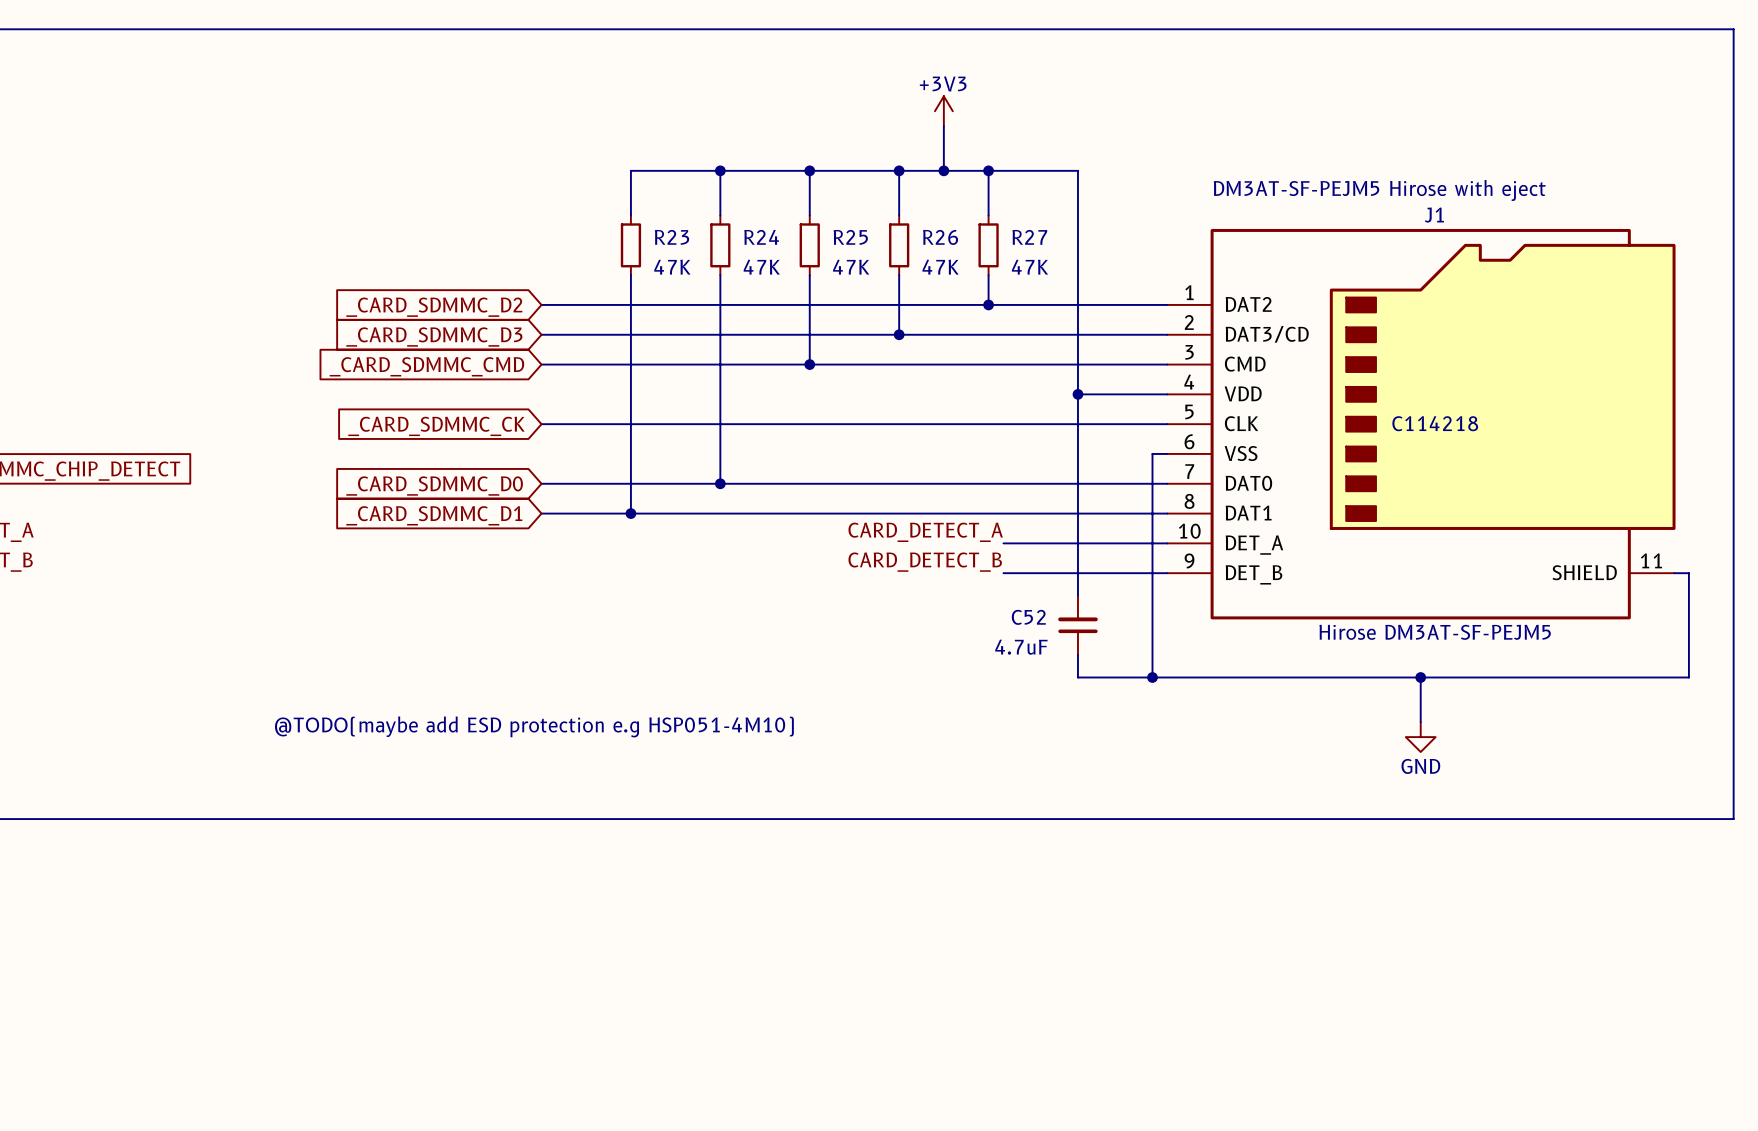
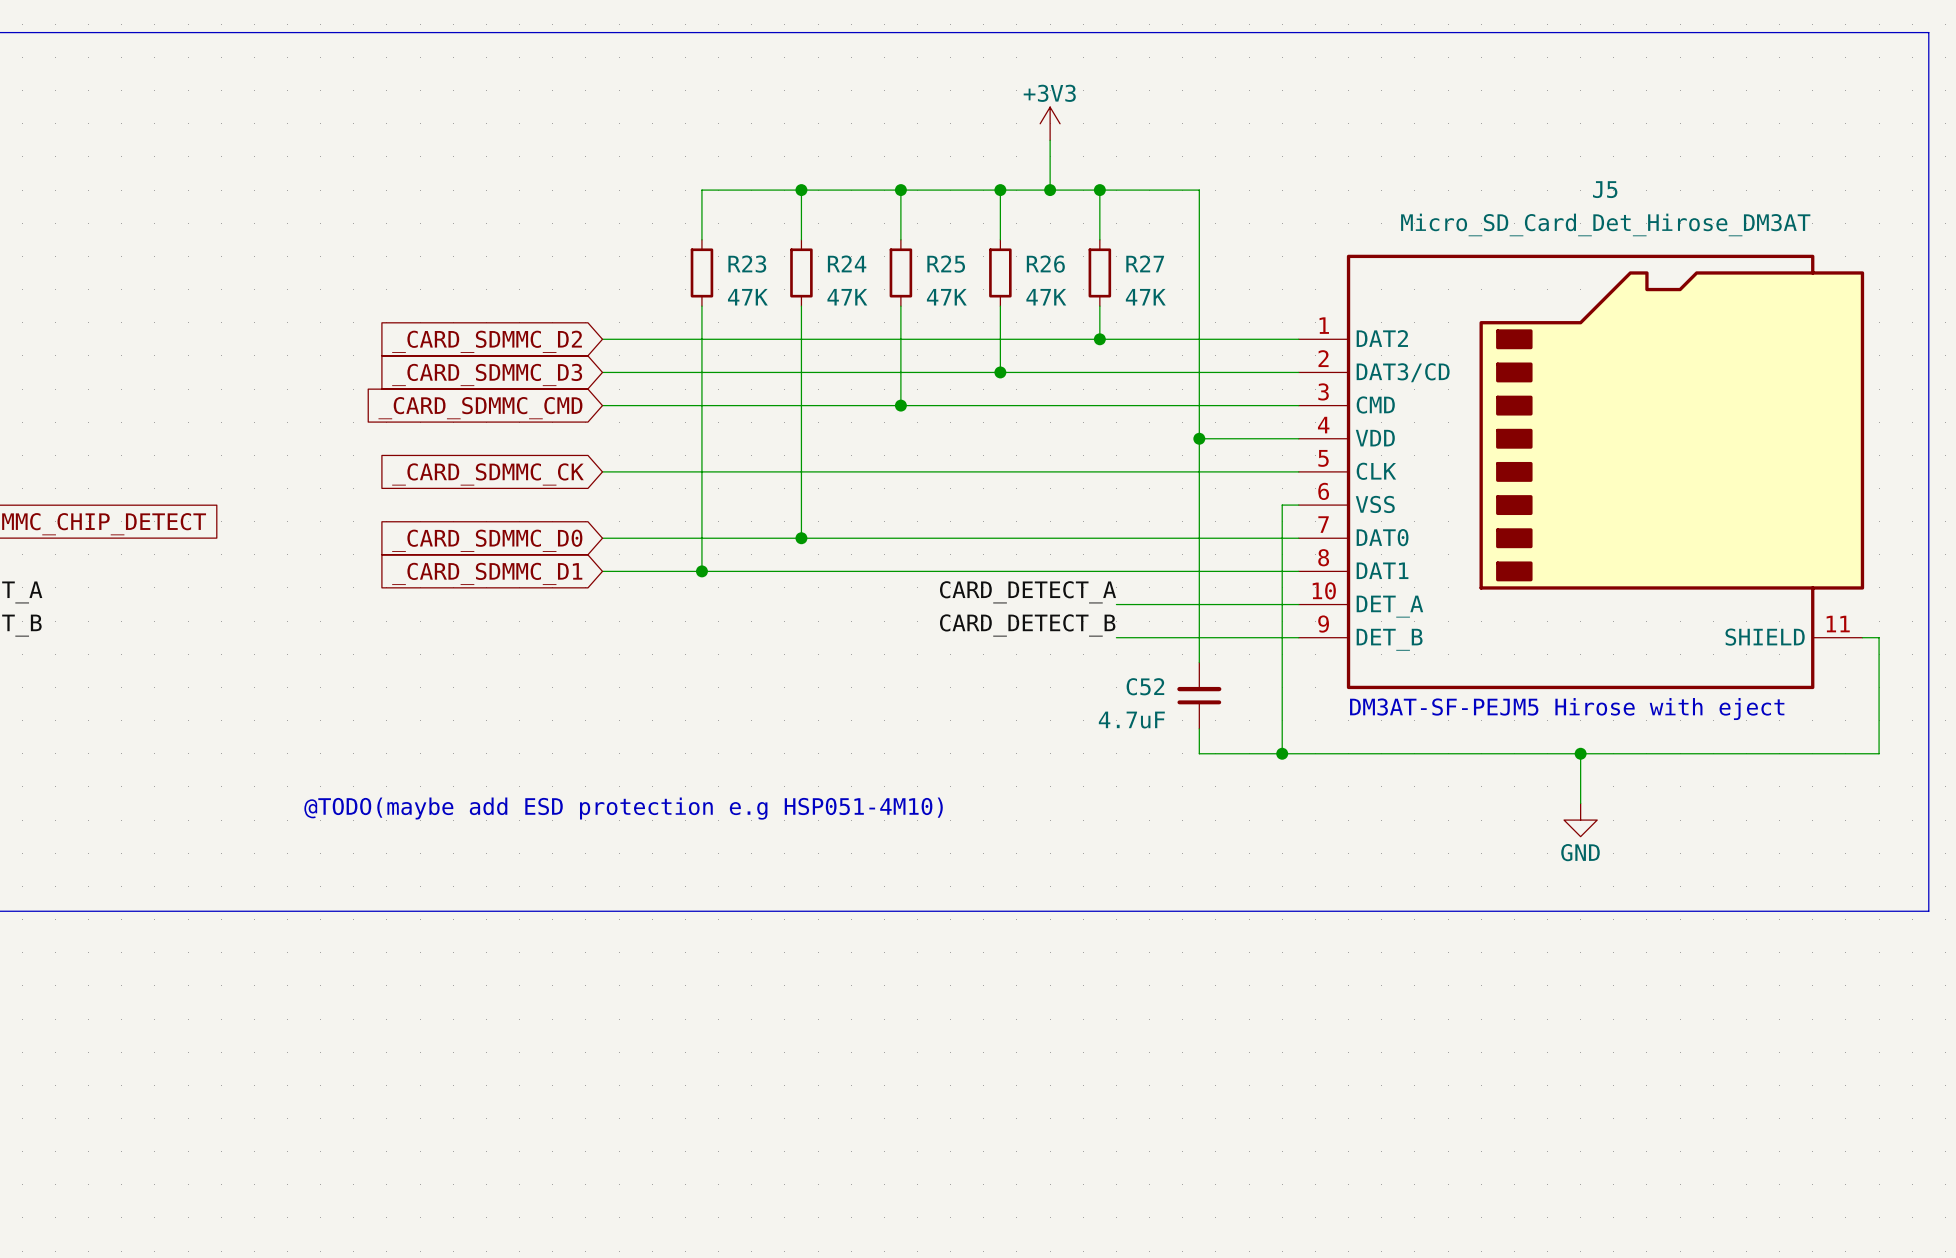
text: DM3AT-SF-PEJM5 Hirose with eject (1379, 190) -> none
J1: Hirose DM3AT-SF-PEJM5 (1421, 424) -> none
J5: none -> Micro_SD_Card_Det_Hirose_DM3AT (1581, 471)
text: none -> DM3AT-SF-PEJM5 Hirose with eject (1567, 709)

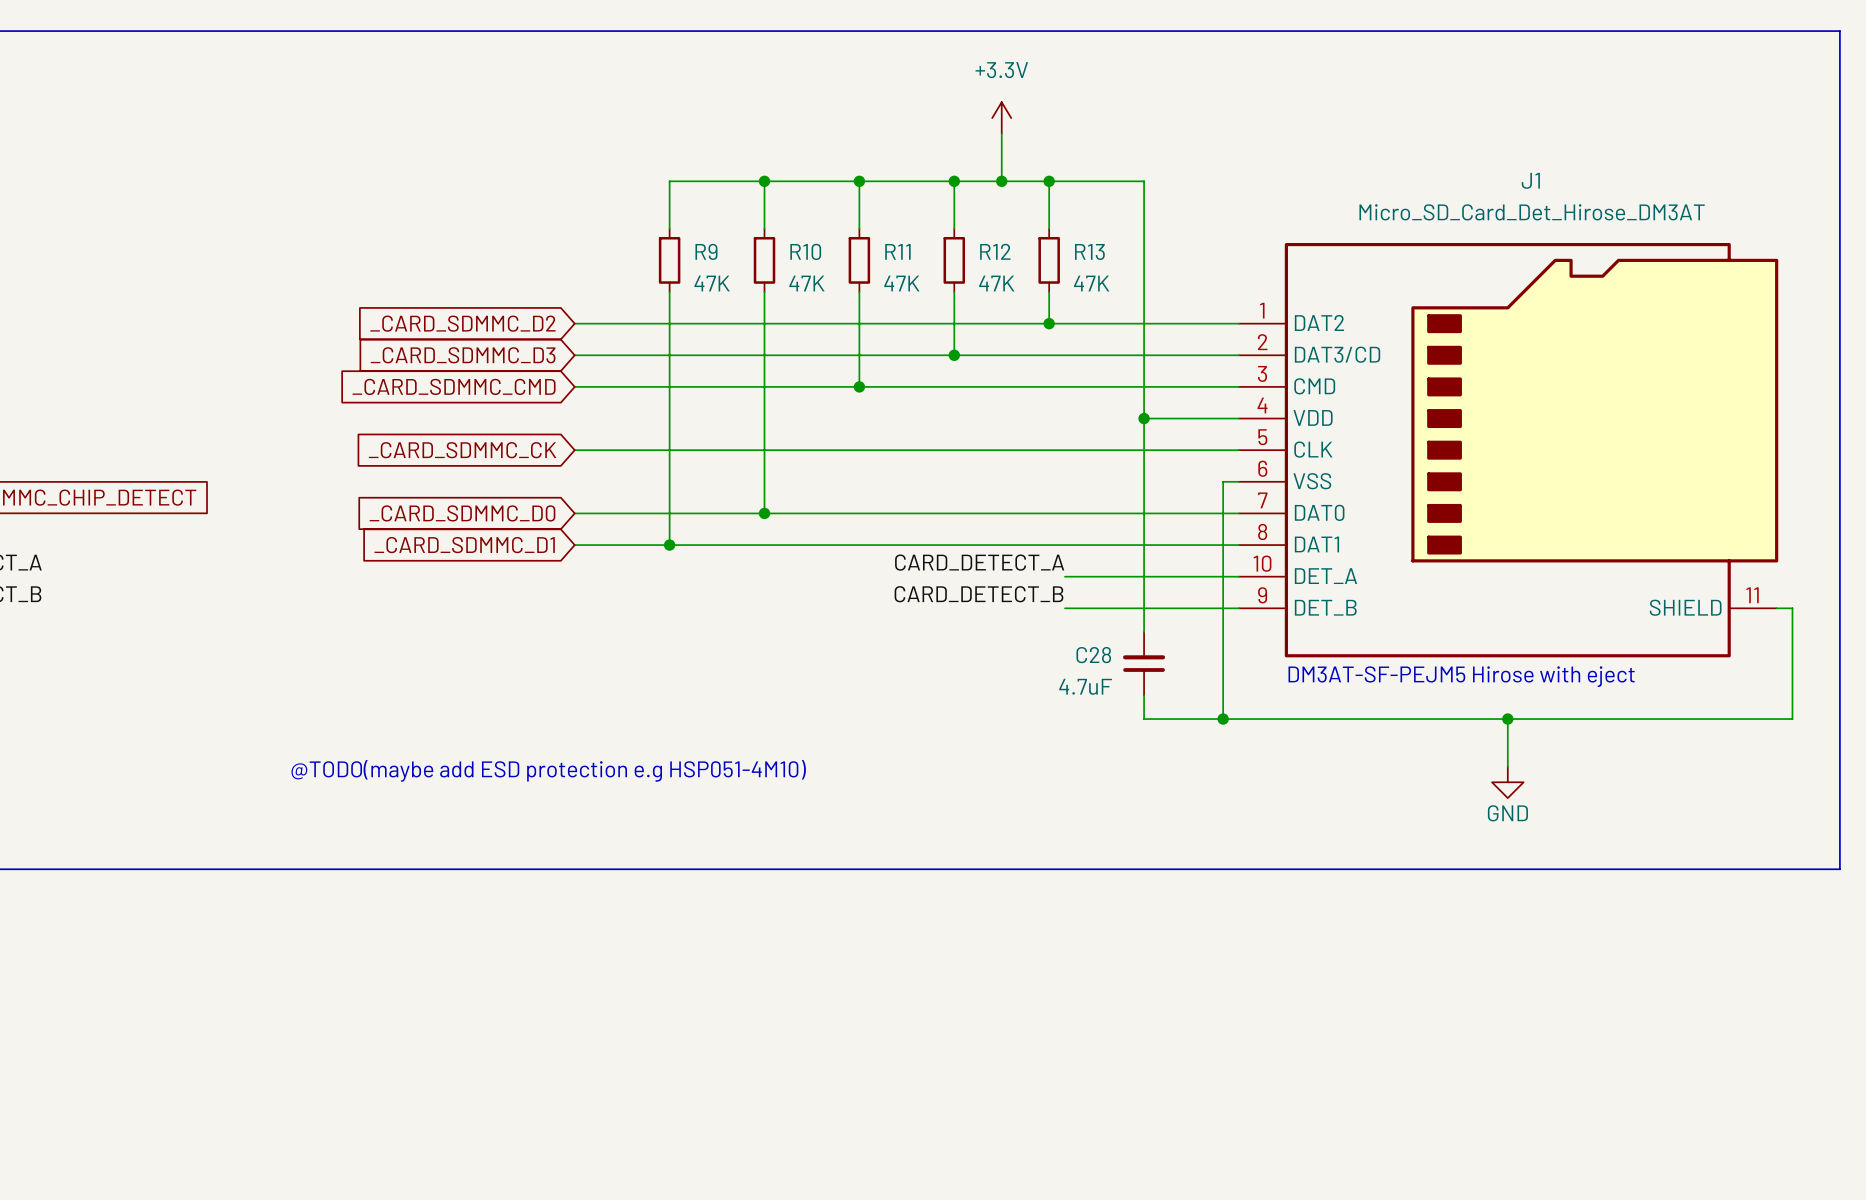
power symbol: +3V3 (1050, 123) -> +3.3V (1001, 118)
J5 name: J5 (1605, 189) -> J1 (1530, 180)
R24 name: R24 (847, 263) -> R10 (805, 251)
R27 name: R27 (1145, 263) -> R13 (1089, 251)
R23 name: R23 (747, 264) -> R9 (706, 251)
R25 name: R25 (946, 264) -> R11 (897, 251)
R26 name: R26 (1045, 264) -> R12 (995, 251)
C52 name: C52 (1145, 686) -> C28 (1093, 655)

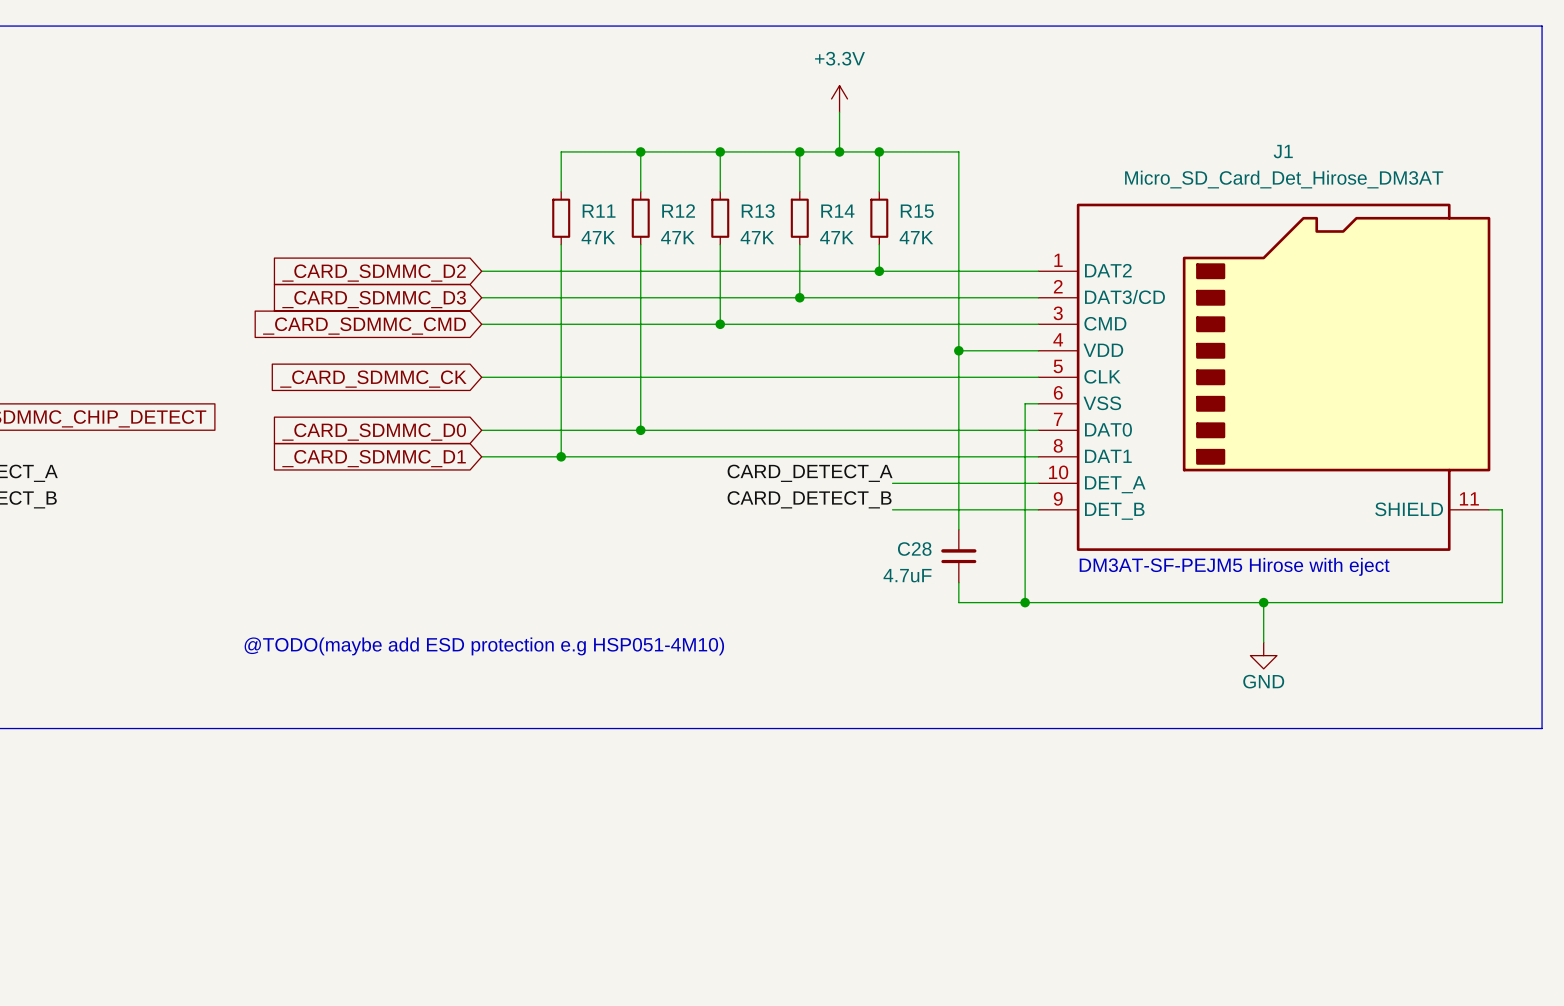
R9 name: R9 (706, 251) -> R11 (599, 211)
R10 name: R10 (805, 251) -> R12 (678, 211)
R11 name: R11 (897, 251) -> R13 (758, 211)
R12 name: R12 (995, 251) -> R14 (837, 211)
R13 name: R13 (1089, 251) -> R15 (917, 211)

